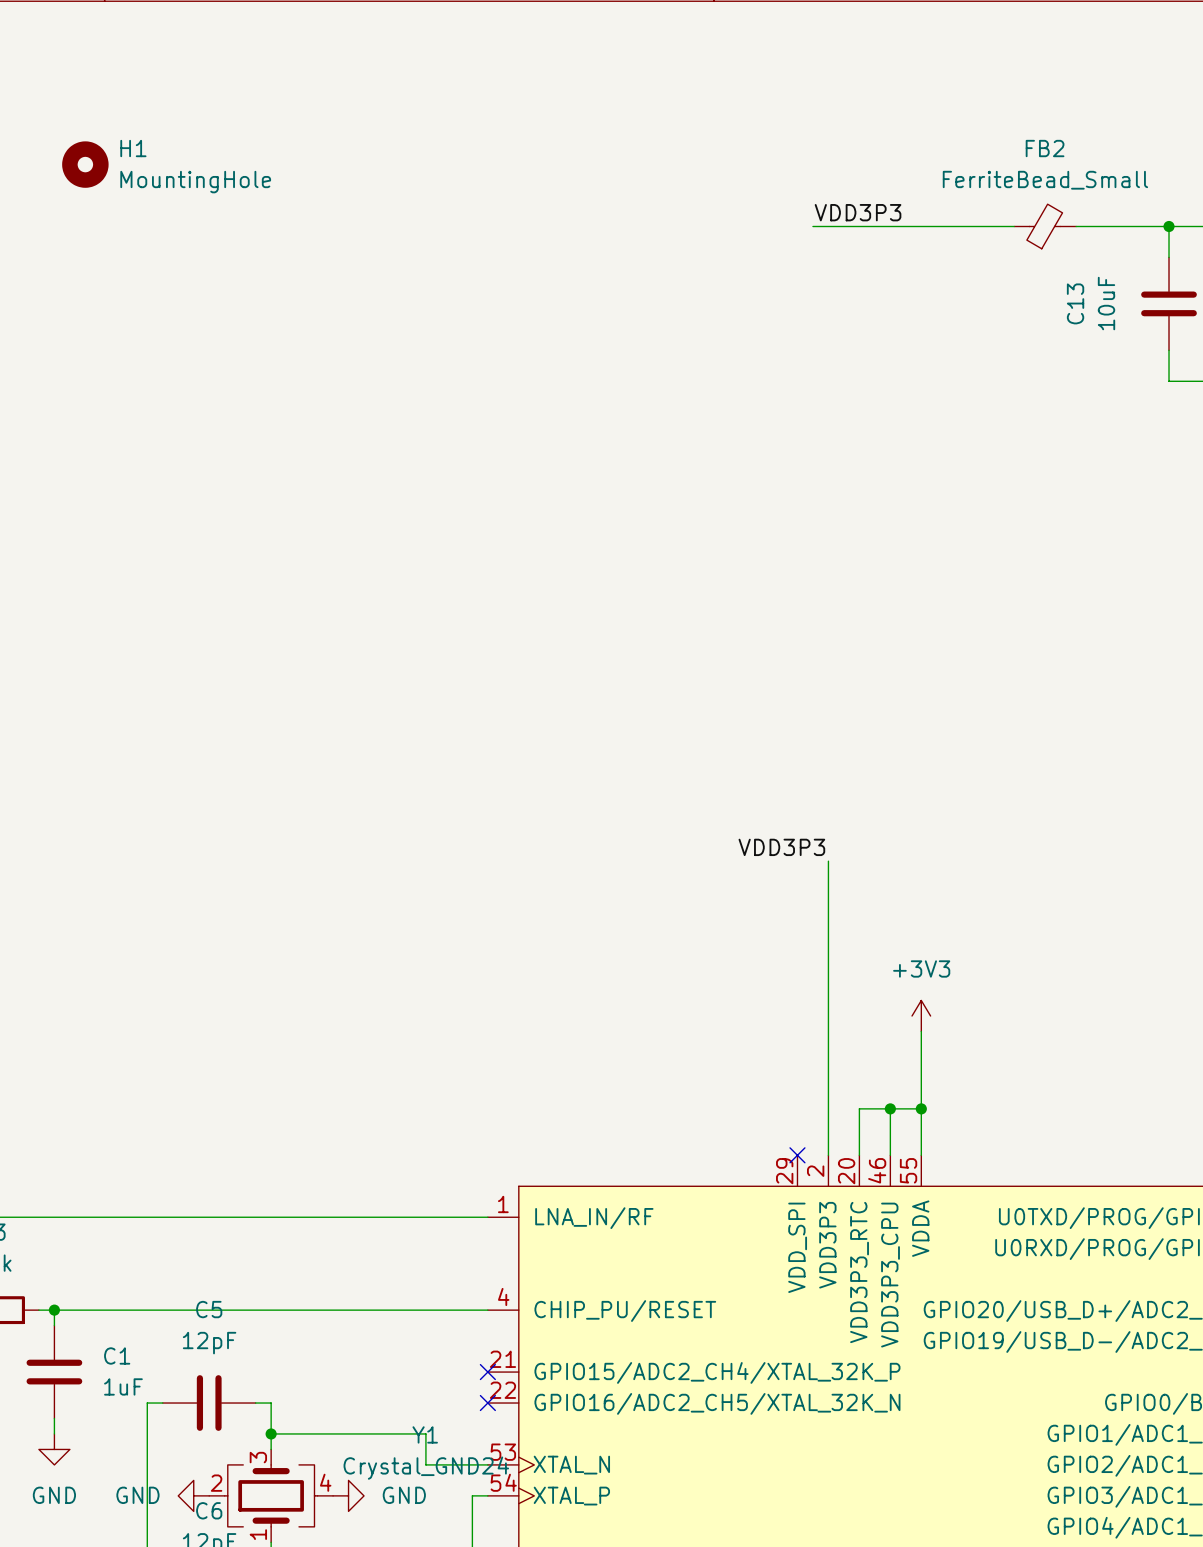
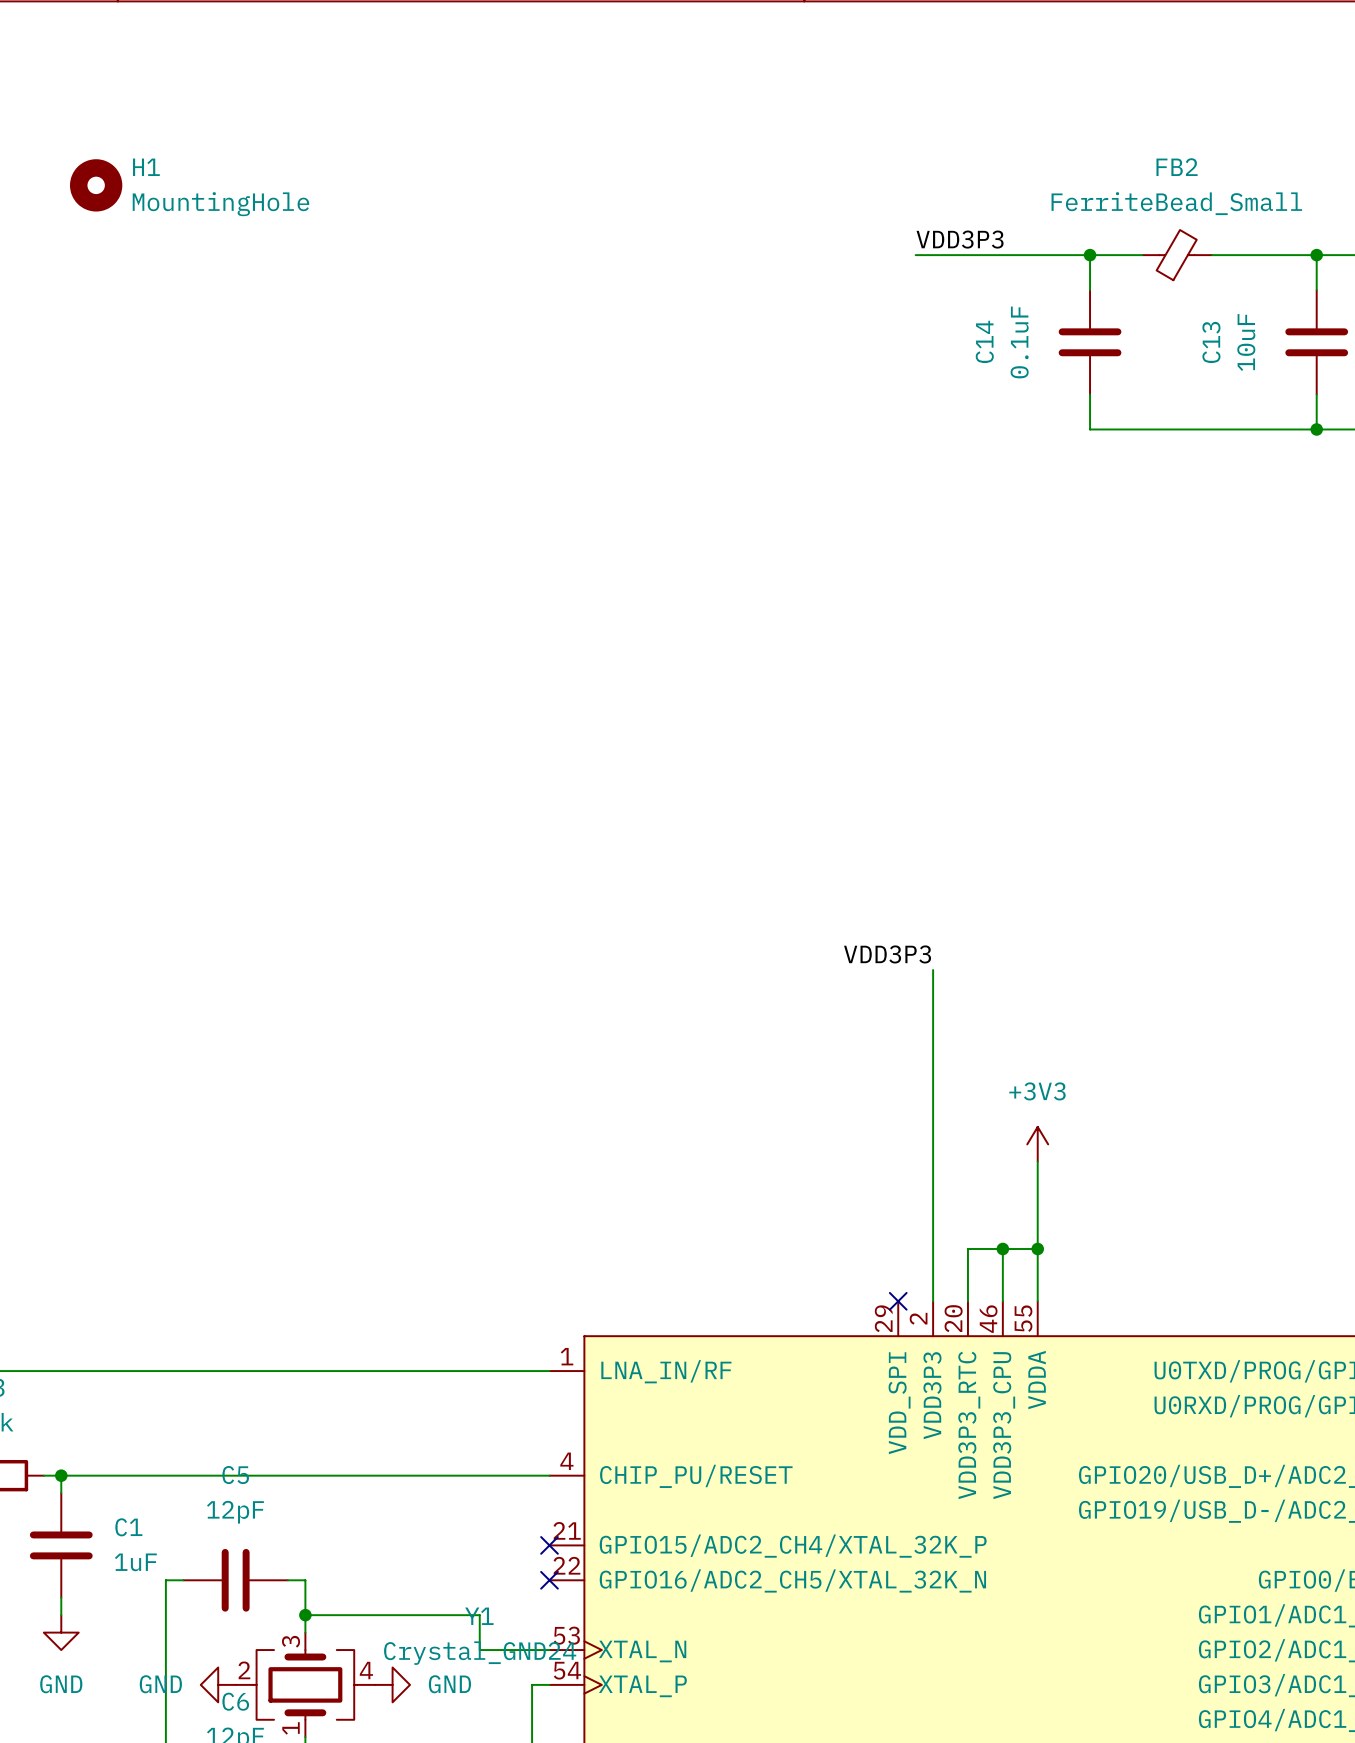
wire: none -> (1090, 255) (1090, 289)
junction: none -> (1090, 255)
C14: none -> 0.1uF (1090, 342)
wire: none -> (1090, 394) (1090, 429) (1316, 429)
junction: none -> (1316, 429)

